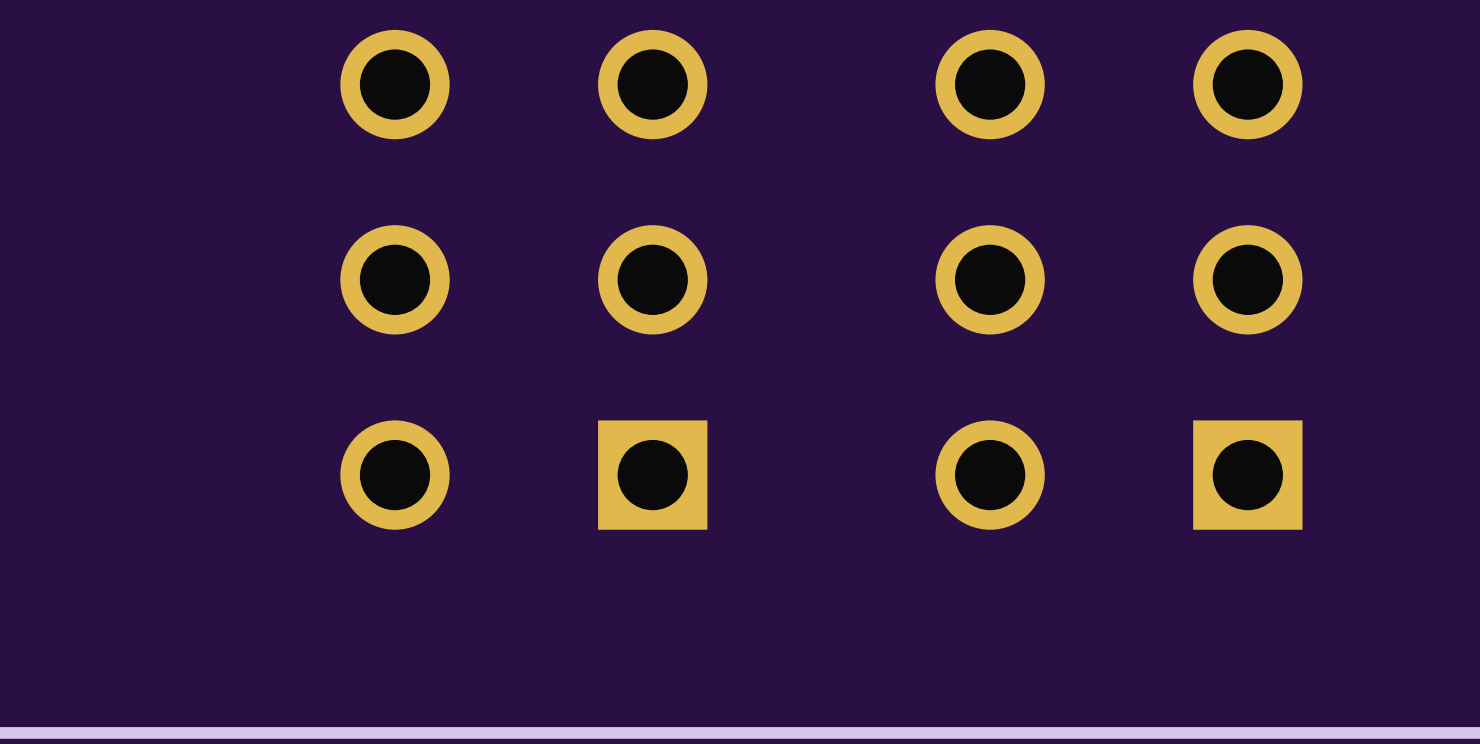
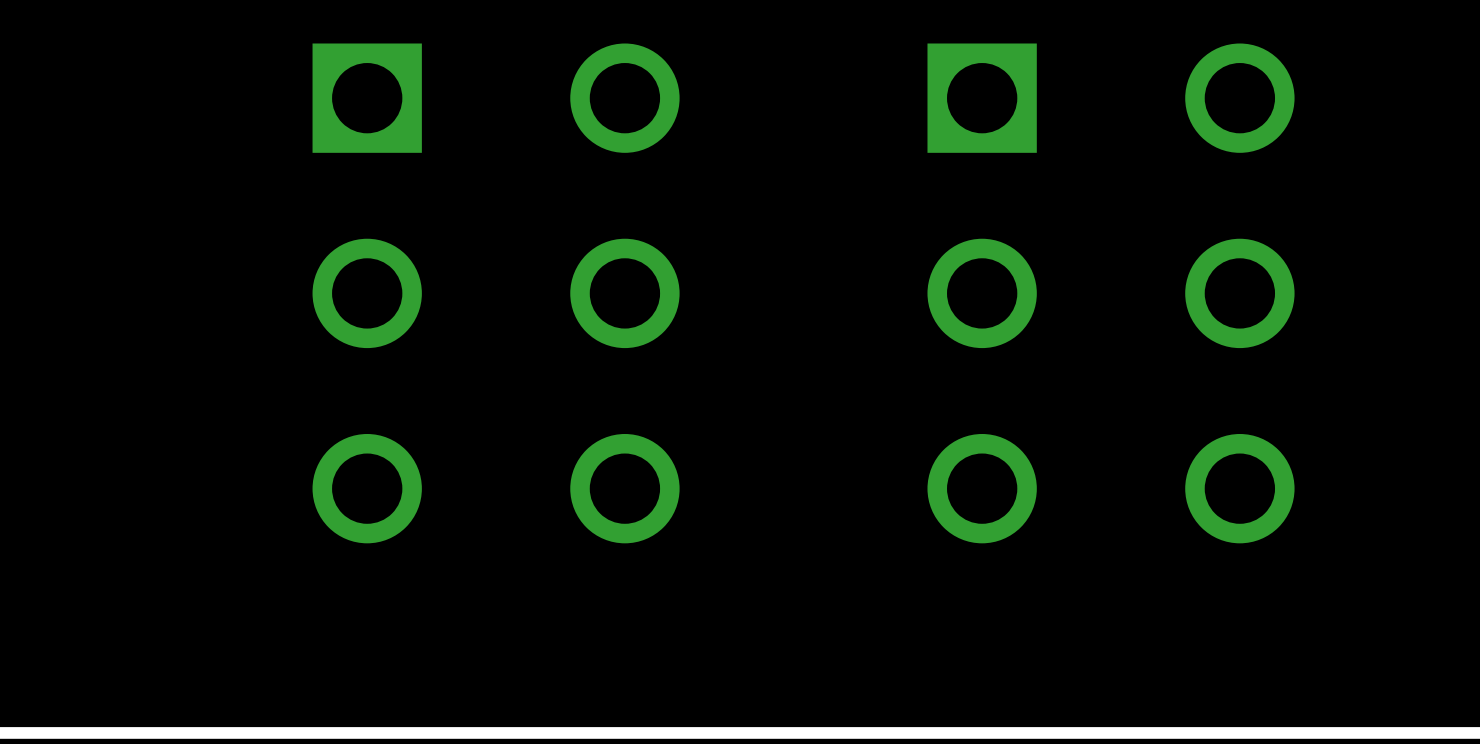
part rotation: 0° (523, 279) -> 180° (496, 293)
part rotation: 0° (1118, 279) -> 180° (1111, 293)

